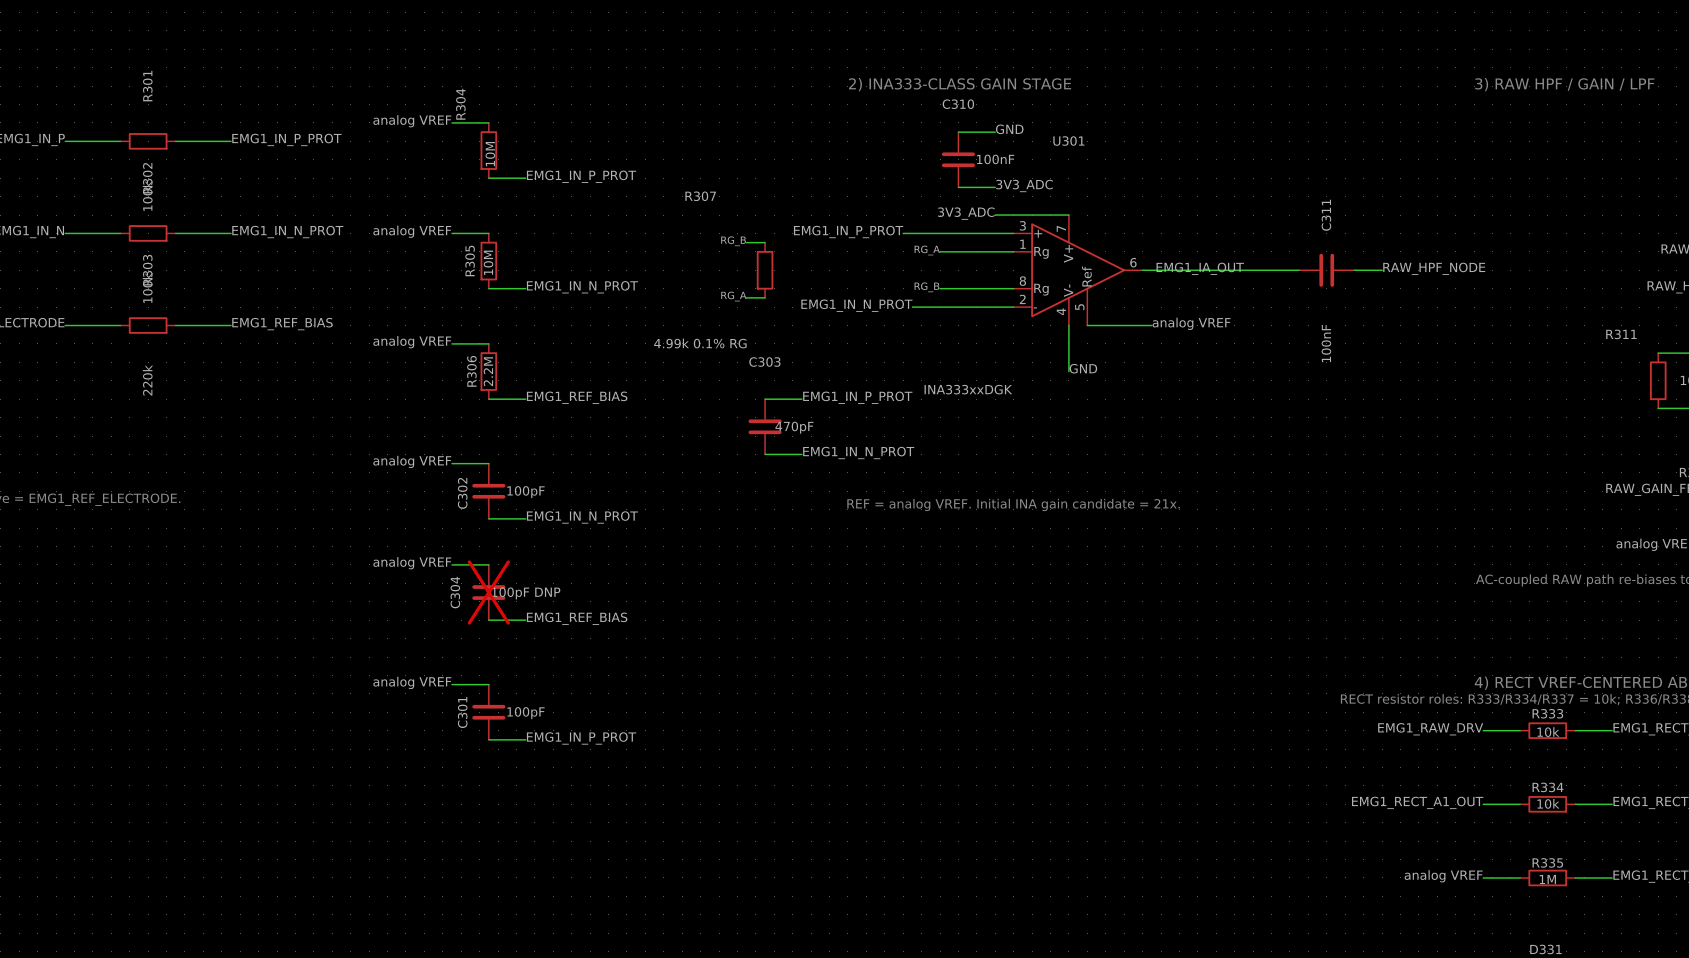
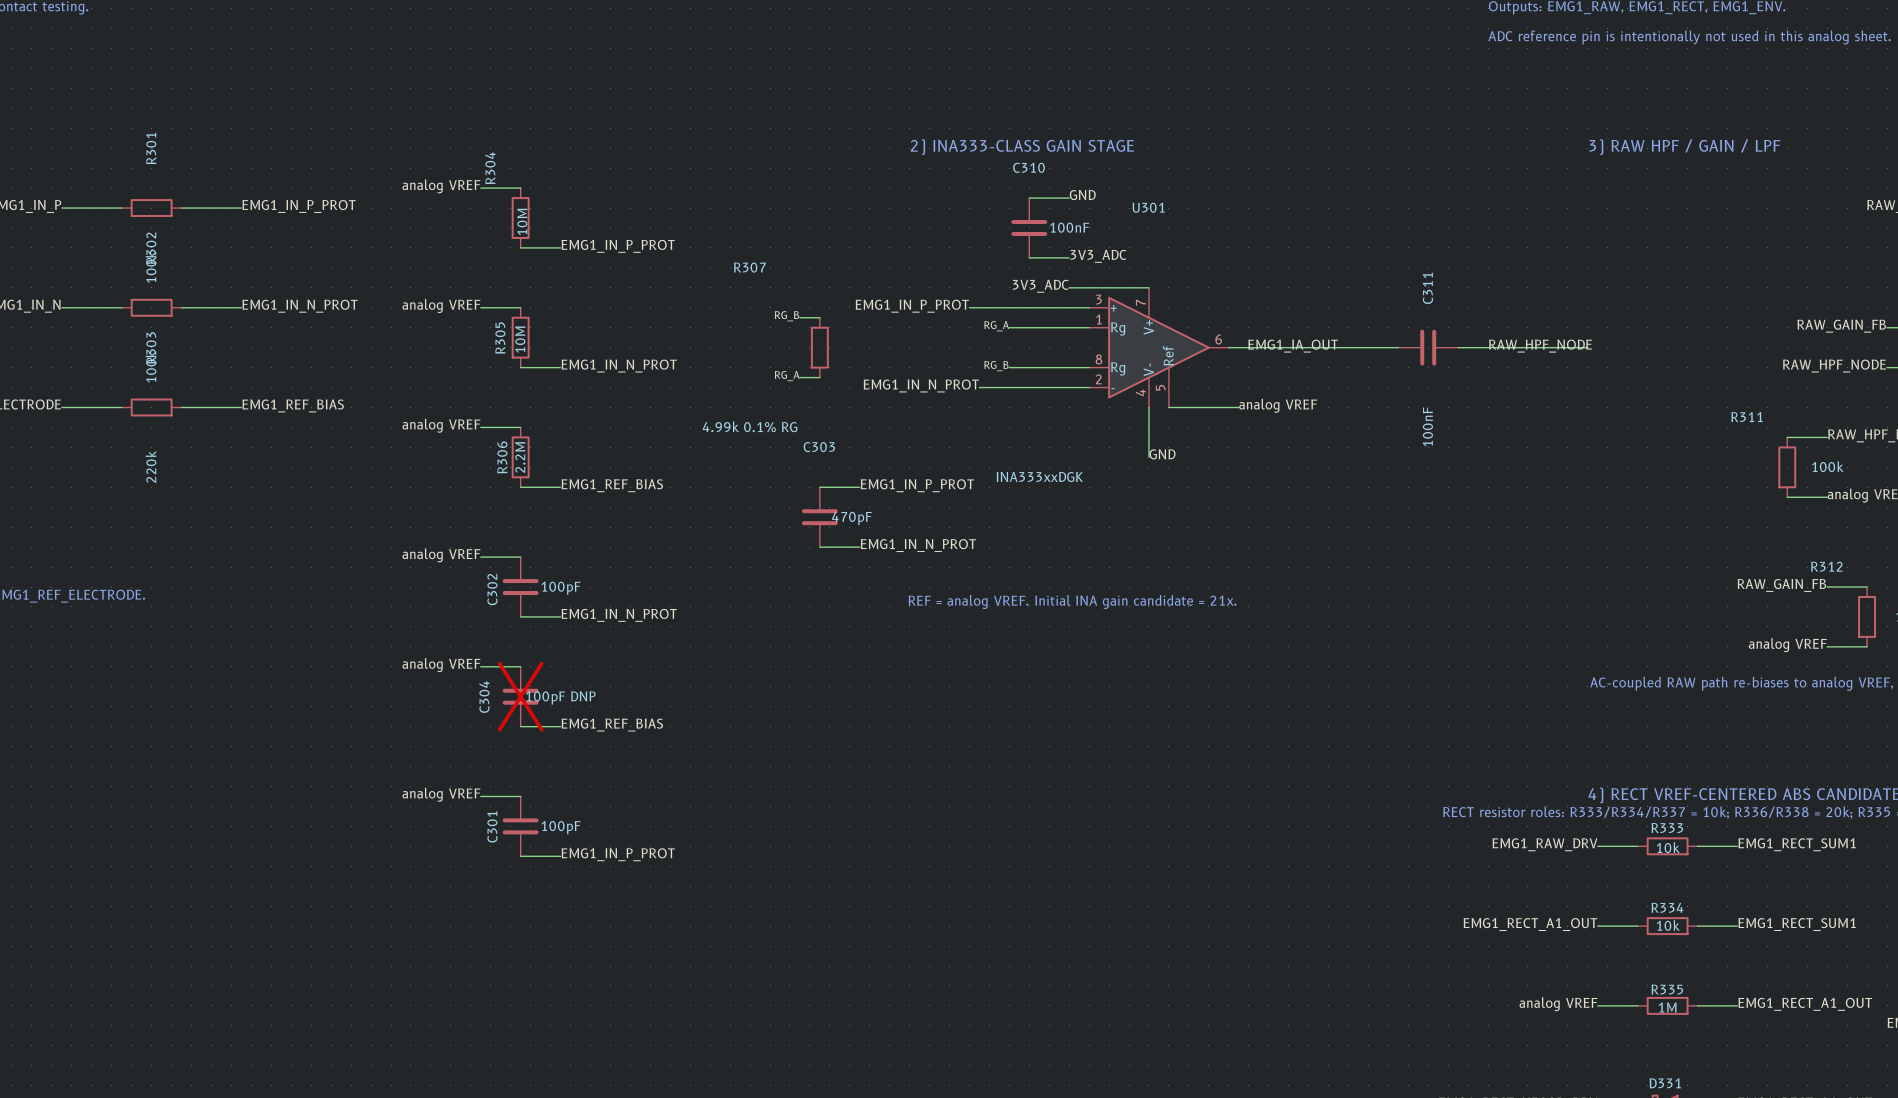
wire: none -> (1488, 347) (1587, 347)

